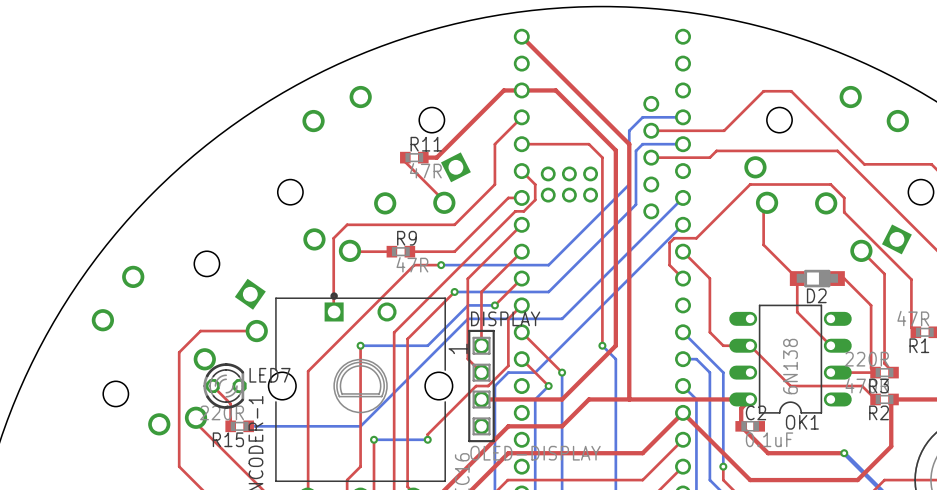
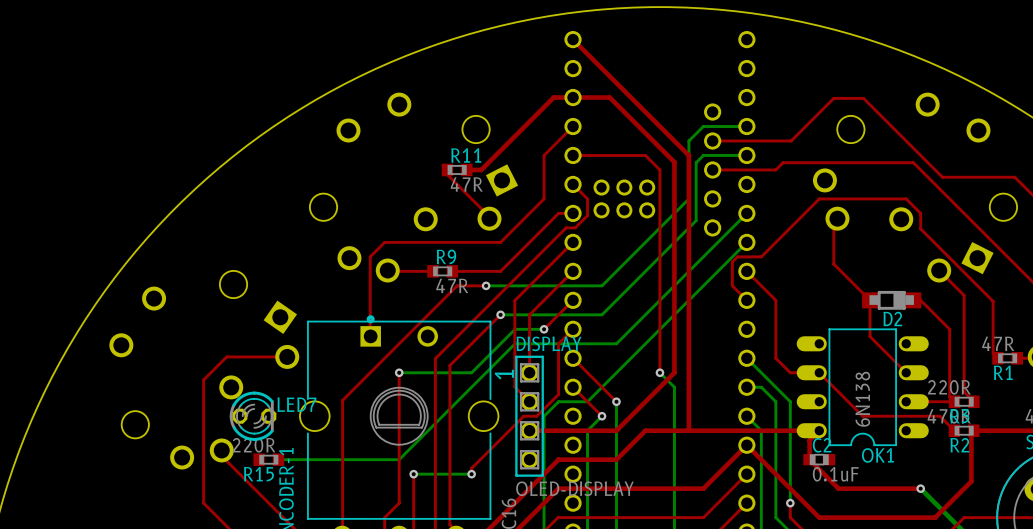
top track: (212, 386) (230, 403) (230, 426) -> none

